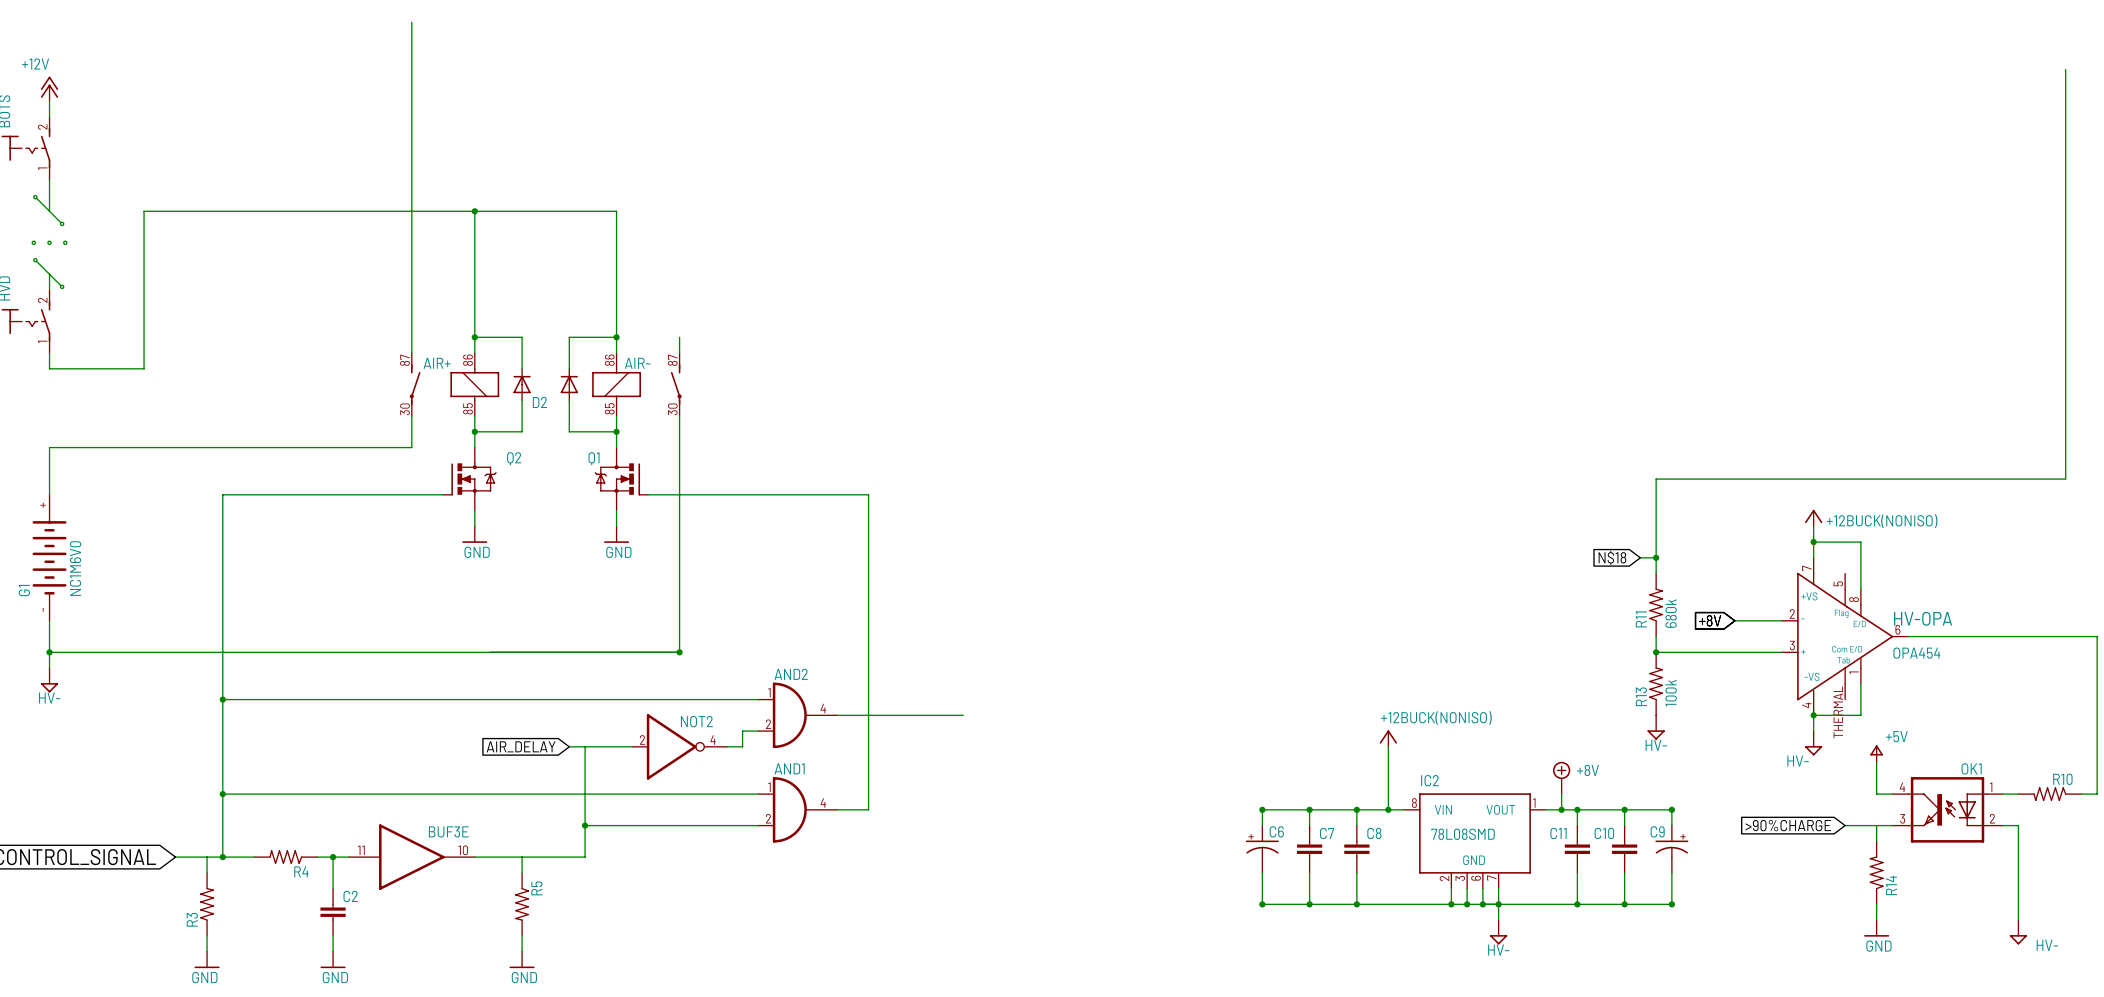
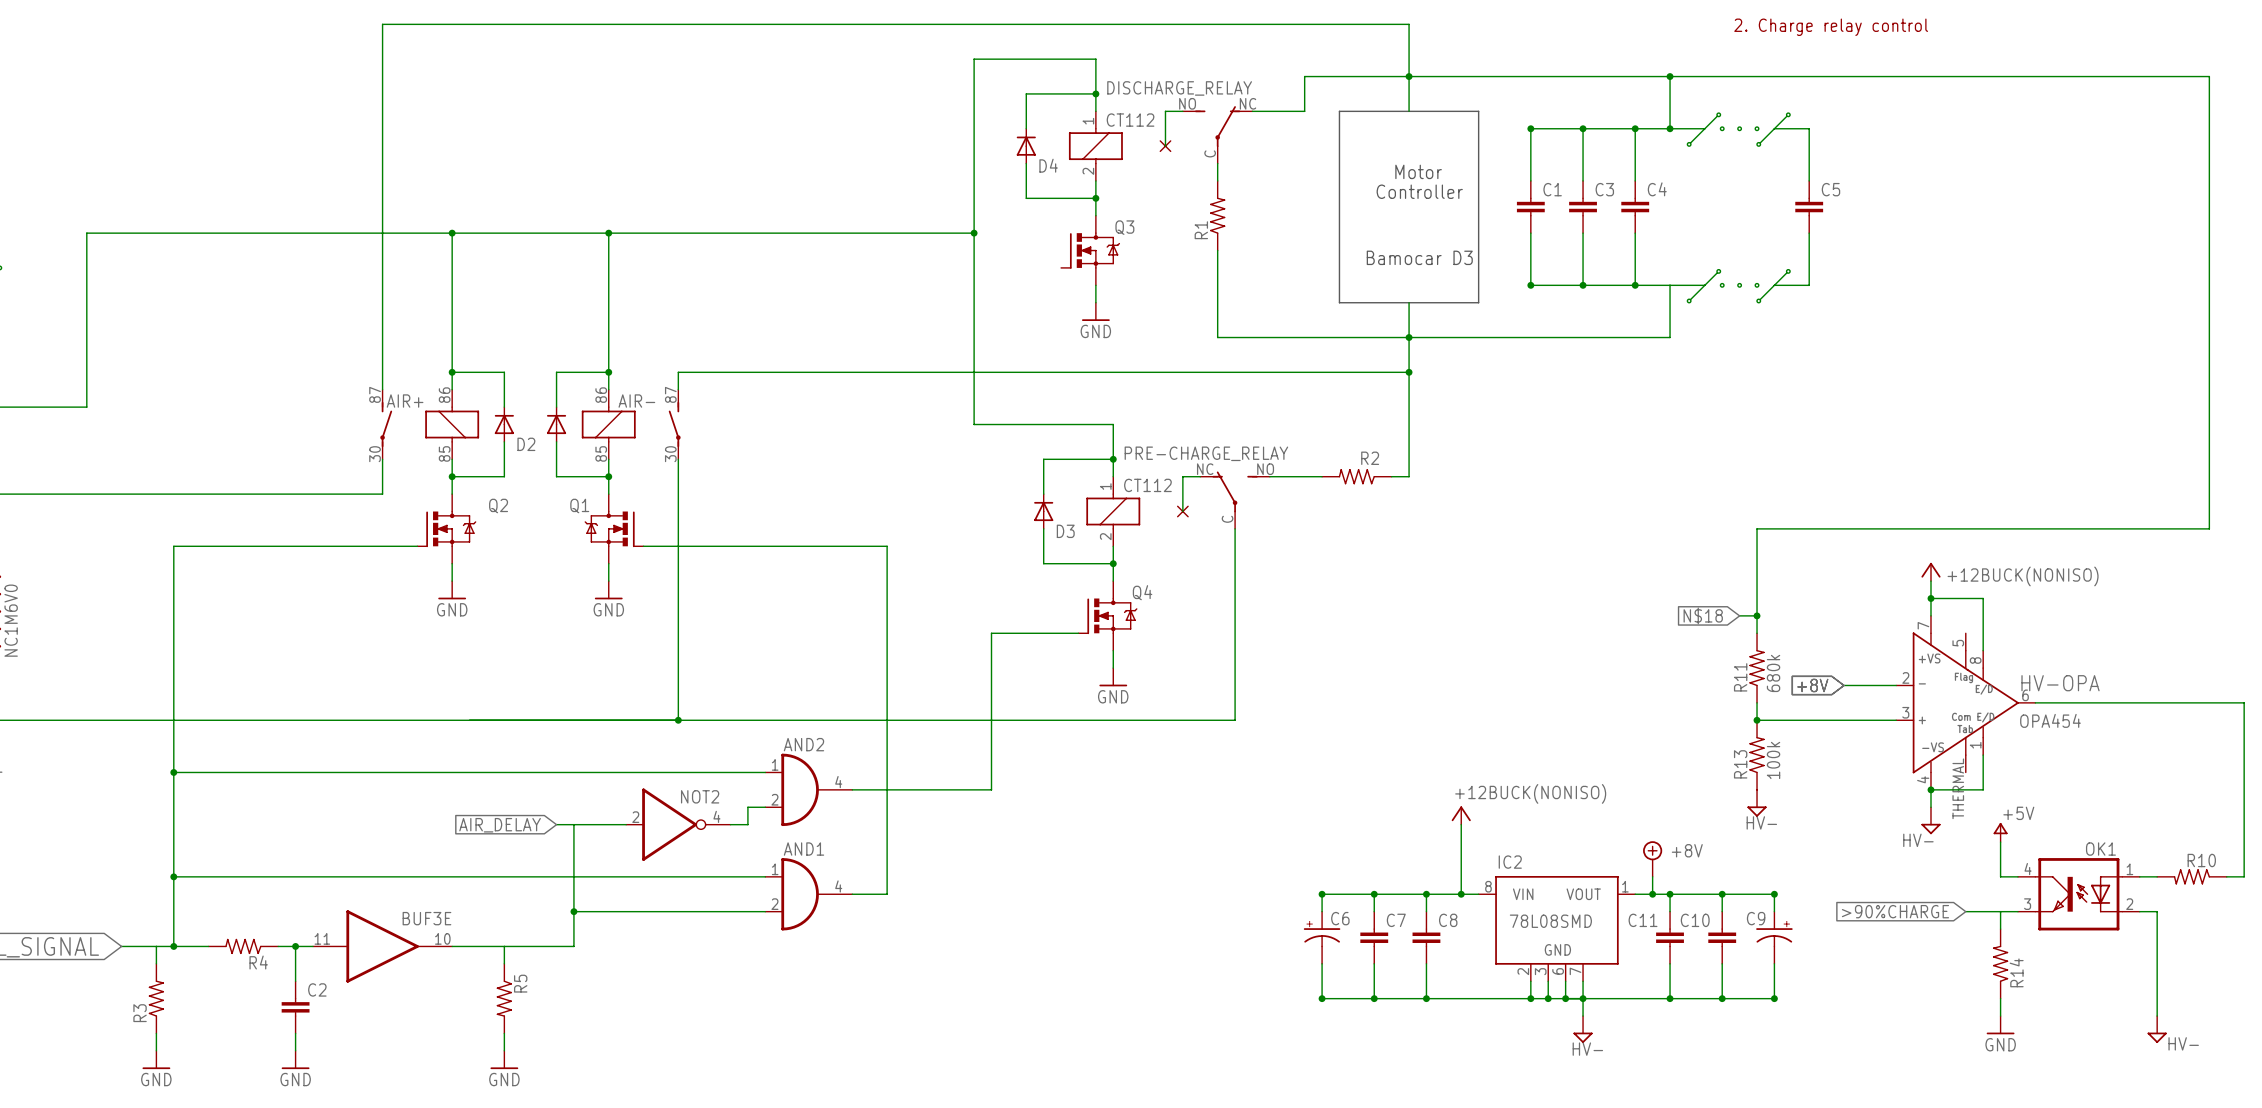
wire: none -> (382, 24) (1409, 24) (1409, 111)
text: none -> 2. Charge relay control (1831, 27)
junction: none -> (1409, 76)
wire: none -> (1670, 76) (1670, 128)
junction: none -> (1670, 76)
wire: none -> (2209, 76) (1304, 76) (1304, 111) (1252, 111)
wire: none -> (1095, 93) (1026, 93) (1026, 128)
junction: none -> (1095, 93)
wire: none -> (1095, 111) (1095, 59) (974, 59) (974, 424) (1113, 424) (1113, 476)
wire: none -> (1182, 111) (1165, 111) (1165, 146)
bus: none -> (1339, 111) (1339, 302) (1478, 302) (1478, 111) (1339, 111)
drawing: none -> [1716, 112, 1722, 118]
drawing: none -> [1786, 112, 1791, 118]
wire: none -> (1716, 116) (1690, 142)
wire: none -> (1786, 116) (1760, 142)
drawing: none -> [1720, 126, 1725, 131]
drawing: none -> [1737, 126, 1742, 131]
drawing: none -> [1755, 126, 1760, 131]
junction: none -> (1530, 128)
wire: none -> (1583, 128) (1583, 180)
junction: none -> (1583, 128)
wire: none -> (1635, 128) (1635, 180)
junction: none -> (1635, 128)
junction: none -> (1670, 128)
wire: none -> (1704, 128) (1530, 128) (1530, 180)
wire: none -> (1774, 128) (1809, 128) (1809, 180)
part: none -> (1217, 134)
line: none -> (1160, 140) (1170, 151)
line: none -> (1170, 140) (1160, 151)
drawing: none -> [1686, 142, 1692, 147]
drawing: none -> [1756, 142, 1762, 147]
D4: none -> (1026, 146)
DISCHARGE_RELAY: none -> CT112 (1095, 146)
wire: none -> (1026, 163) (1026, 198) (1095, 198)
wire: none -> (1217, 163) (1217, 180)
text: none -> Motor (1418, 171)
wire: none -> (1095, 180) (1095, 215)
text: none -> Controller (1419, 191)
junction: none -> (1095, 198)
C1: none -> (1530, 207)
C3: none -> (1583, 207)
C4: none -> (1635, 207)
C5: none -> (1809, 207)
R1: none -> (1217, 215)
wire: none -> (608, 233) (974, 233)
junction: none -> (608, 233)
junction: none -> (974, 233)
wire: none -> (1530, 233) (1530, 285) (1704, 285)
wire: none -> (1583, 233) (1583, 285)
wire: none -> (1635, 233) (1635, 285)
wire: none -> (1809, 233) (1809, 285) (1774, 285)
Q3: none -> (1090, 250)
wire: none -> (1217, 250) (1217, 337) (1670, 337) (1670, 285)
text: none -> Bamocar D3 (1419, 257)
drawing: none -> [1716, 269, 1722, 274]
drawing: none -> [1786, 269, 1791, 274]
wire: none -> (1716, 273) (1690, 299)
wire: none -> (1786, 273) (1760, 299)
drawing: none -> [1720, 283, 1725, 288]
drawing: none -> [1737, 283, 1742, 288]
drawing: none -> [1755, 283, 1760, 288]
wire: none -> (1095, 285) (1095, 302)
junction: none -> (1530, 285)
junction: none -> (1583, 285)
junction: none -> (1635, 285)
drawing: none -> [1686, 298, 1692, 304]
drawing: none -> [1756, 298, 1762, 304]
wire: none -> (1409, 302) (1409, 476) (1391, 476)
power symbol: none -> GND (1095, 311)
junction: none -> (1409, 337)
wire: none -> (678, 372) (1409, 372)
junction: none -> (1409, 372)
wire: none -> (1113, 459) (1043, 459) (1043, 494)
junction: none -> (1113, 459)
wire: none -> (1200, 476) (1182, 476) (1182, 511)
wire: none -> (1269, 476) (1322, 476)
R2: none -> (1356, 476)
part: none -> (1235, 500)
line: none -> (1177, 506) (1188, 516)
line: none -> (1188, 506) (1177, 516)
D3: none -> (1043, 511)
PRE-CHARGE_RELAY: none -> CT112 (1113, 511)
wire: none -> (1043, 528) (1043, 563) (1113, 563)
wire: none -> (1235, 528) (1235, 720) (678, 720)
wire: none -> (1113, 546) (1113, 581)
junction: none -> (1113, 563)
Q4: none -> (1107, 615)
wire: none -> (1078, 633) (991, 633) (991, 789)
wire: none -> (1113, 650) (1113, 668)
power symbol: none -> GND (1113, 677)

